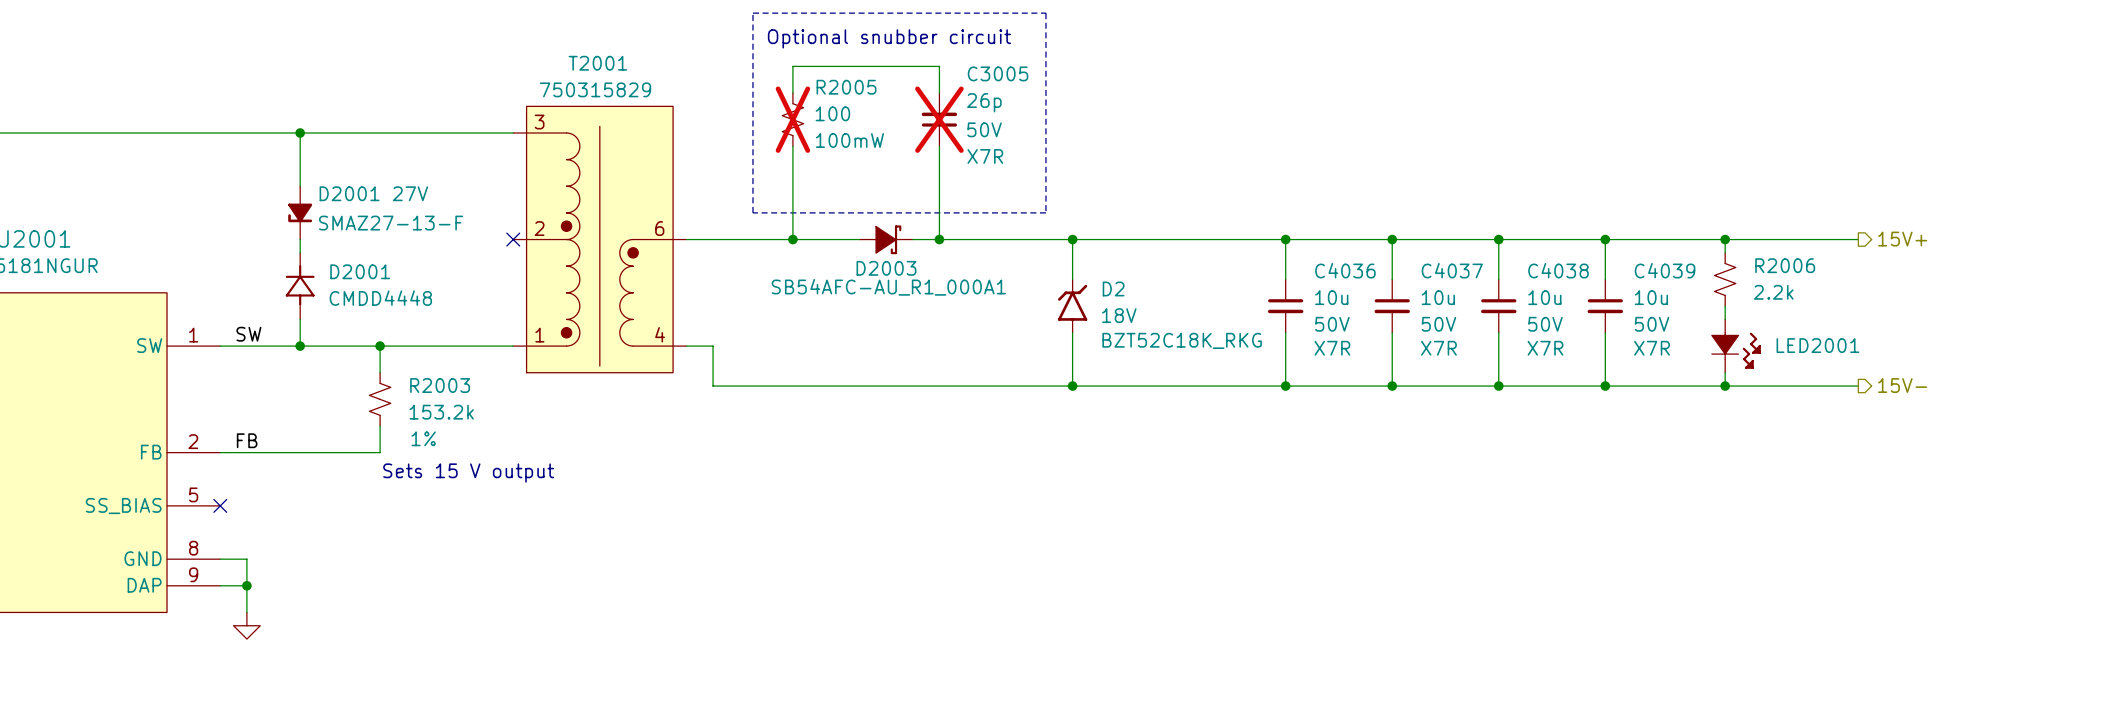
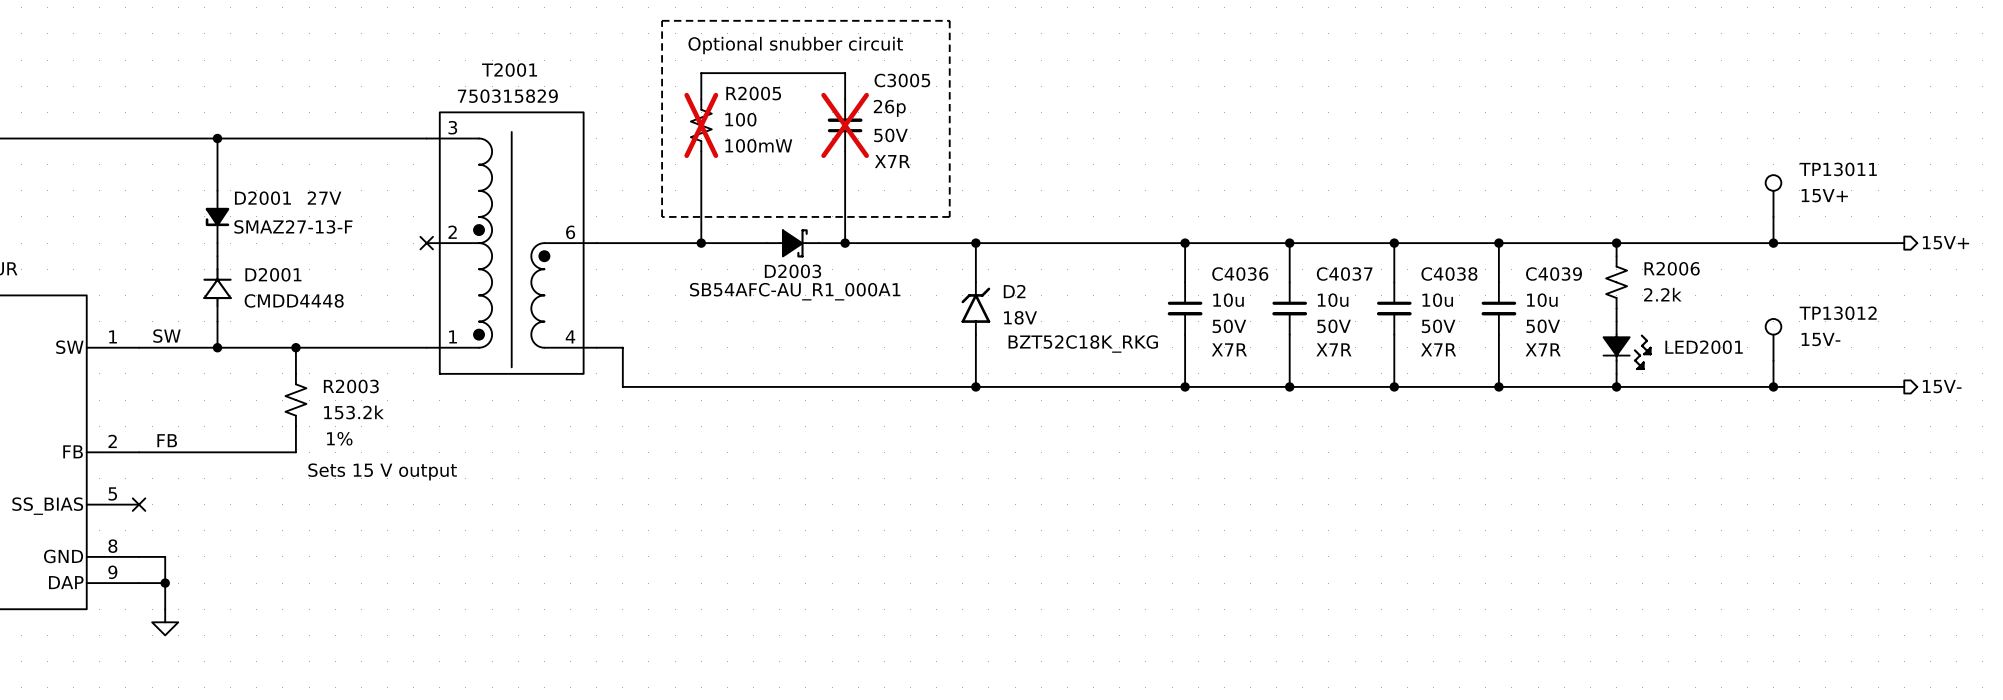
TP13011: none -> 15V+ (1773, 196)
wire: none -> (1773, 216) (1773, 243)
wire: none -> (1747, 243) (1904, 243)
junction: none -> (1773, 243)
hierarchical label position: 15V+ (1902, 239) -> 15V+ (1945, 242)
TP13012: none -> 15V- (1773, 339)
wire: none -> (1773, 360) (1773, 386)
hierarchical label position: 15V- (1902, 385) -> 15V- (1942, 386)
wire: none -> (1747, 386) (1904, 386)
junction: none -> (1773, 386)

